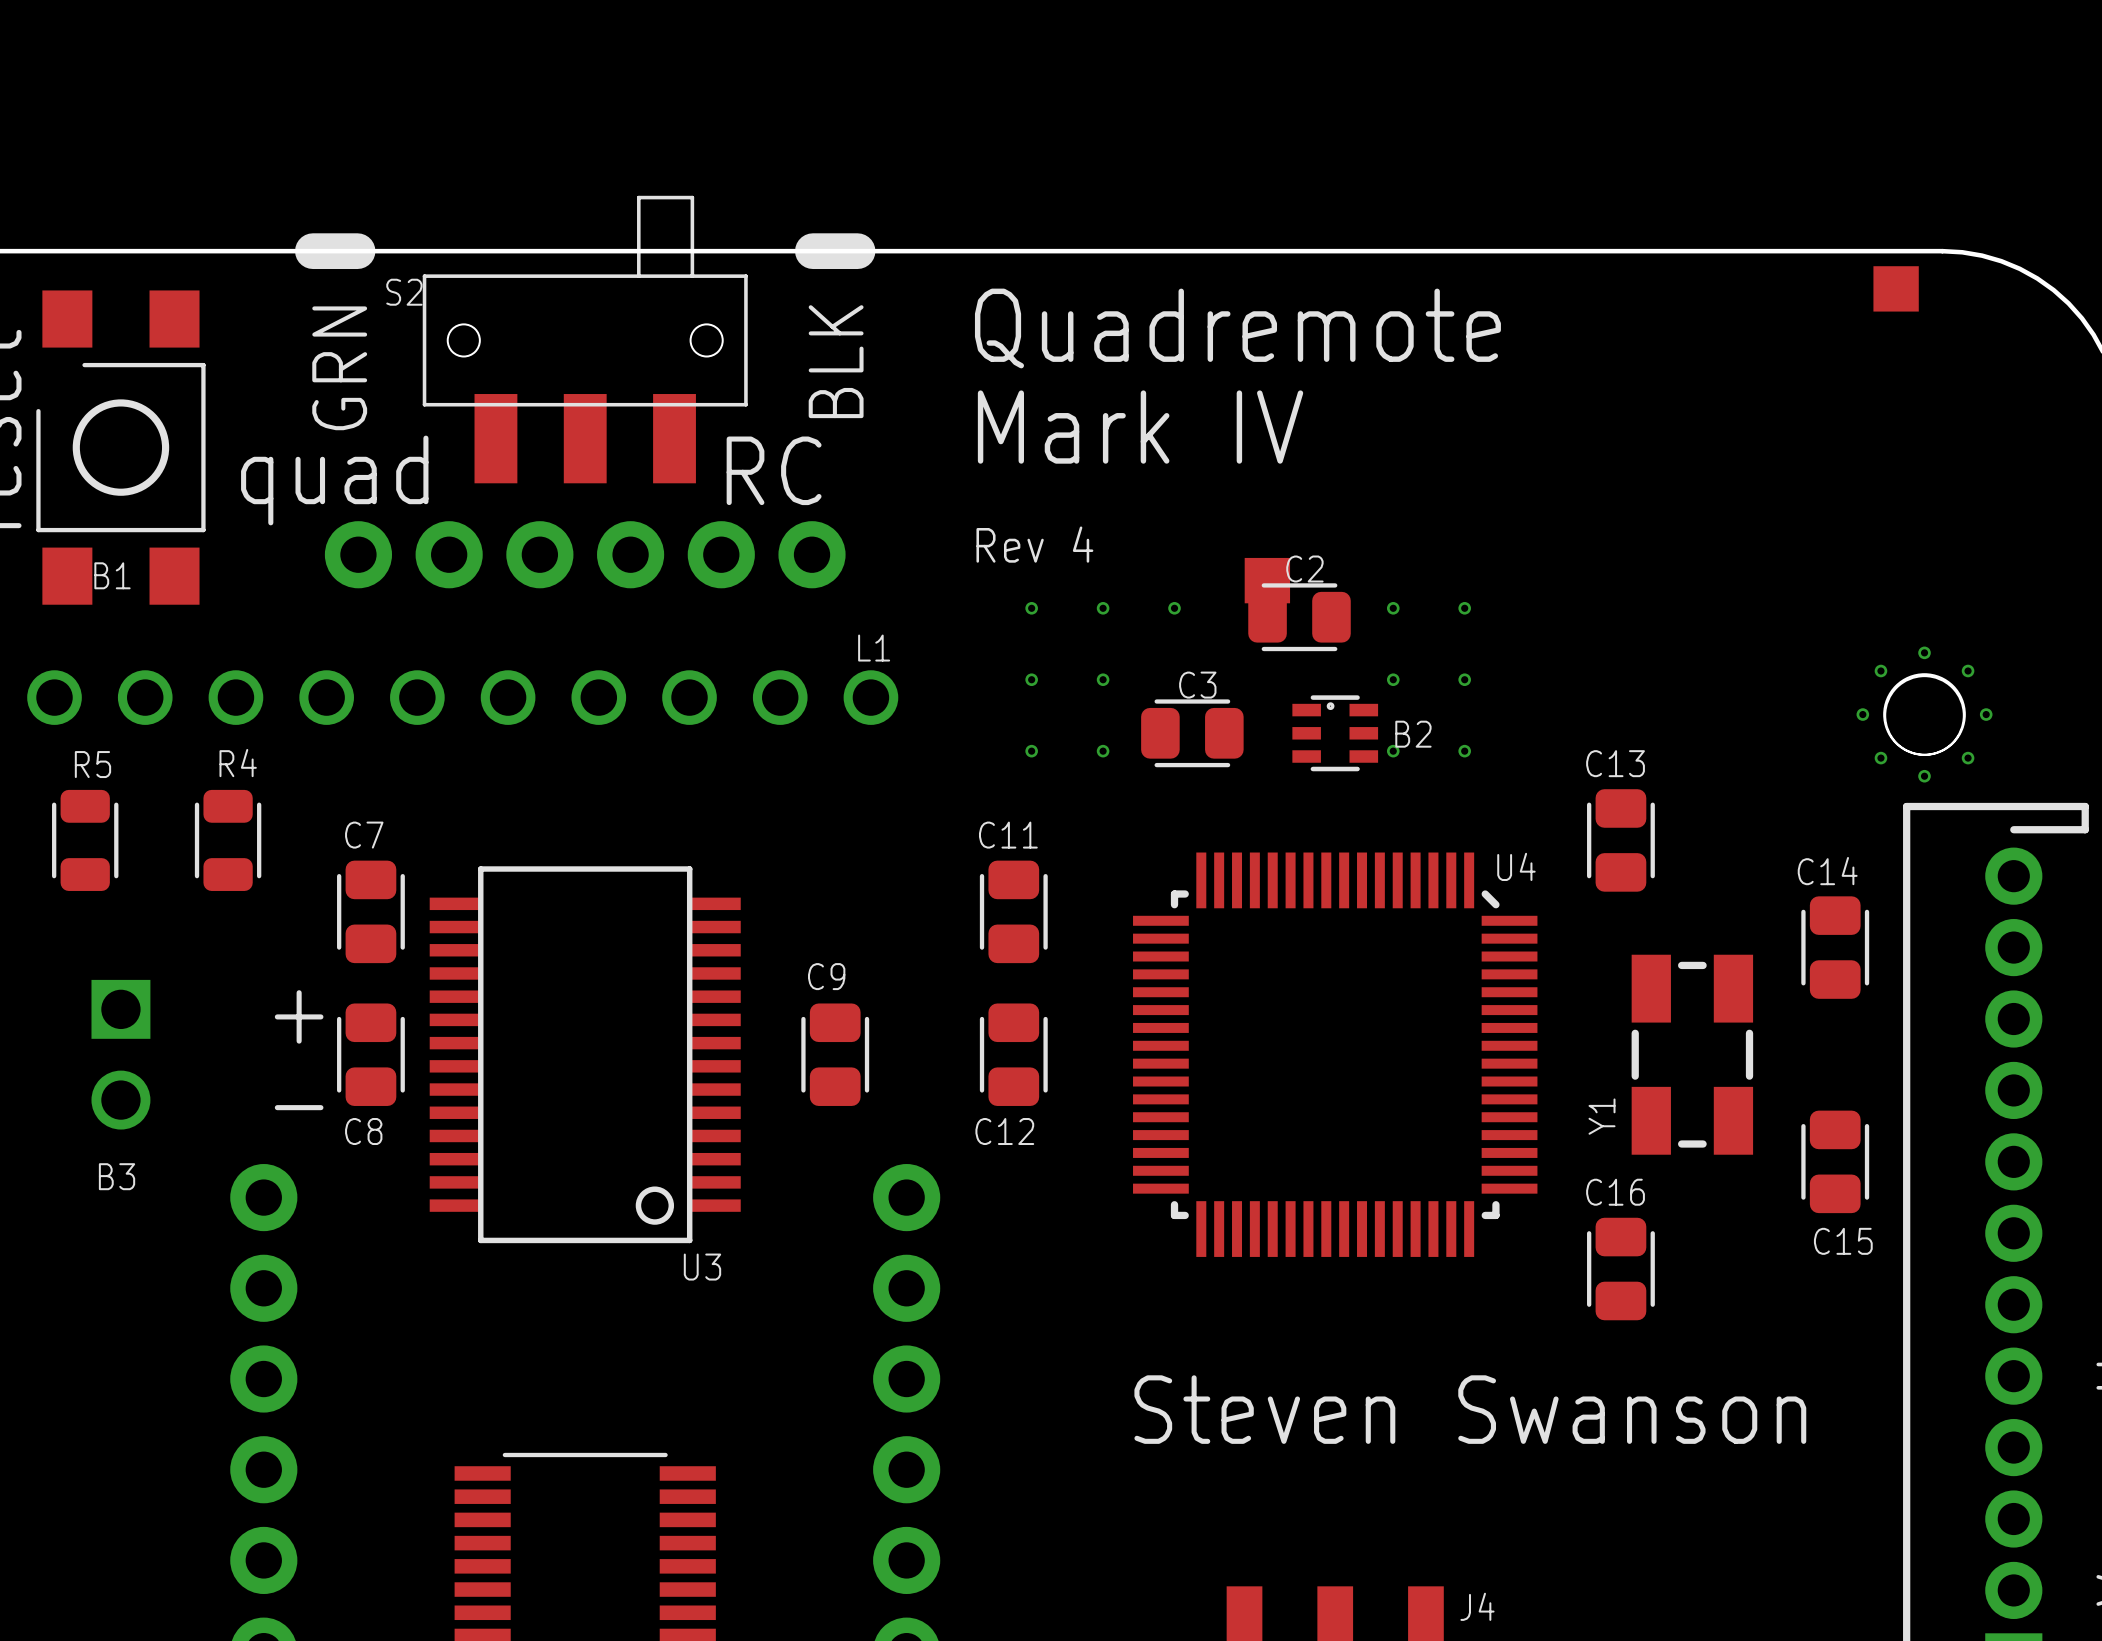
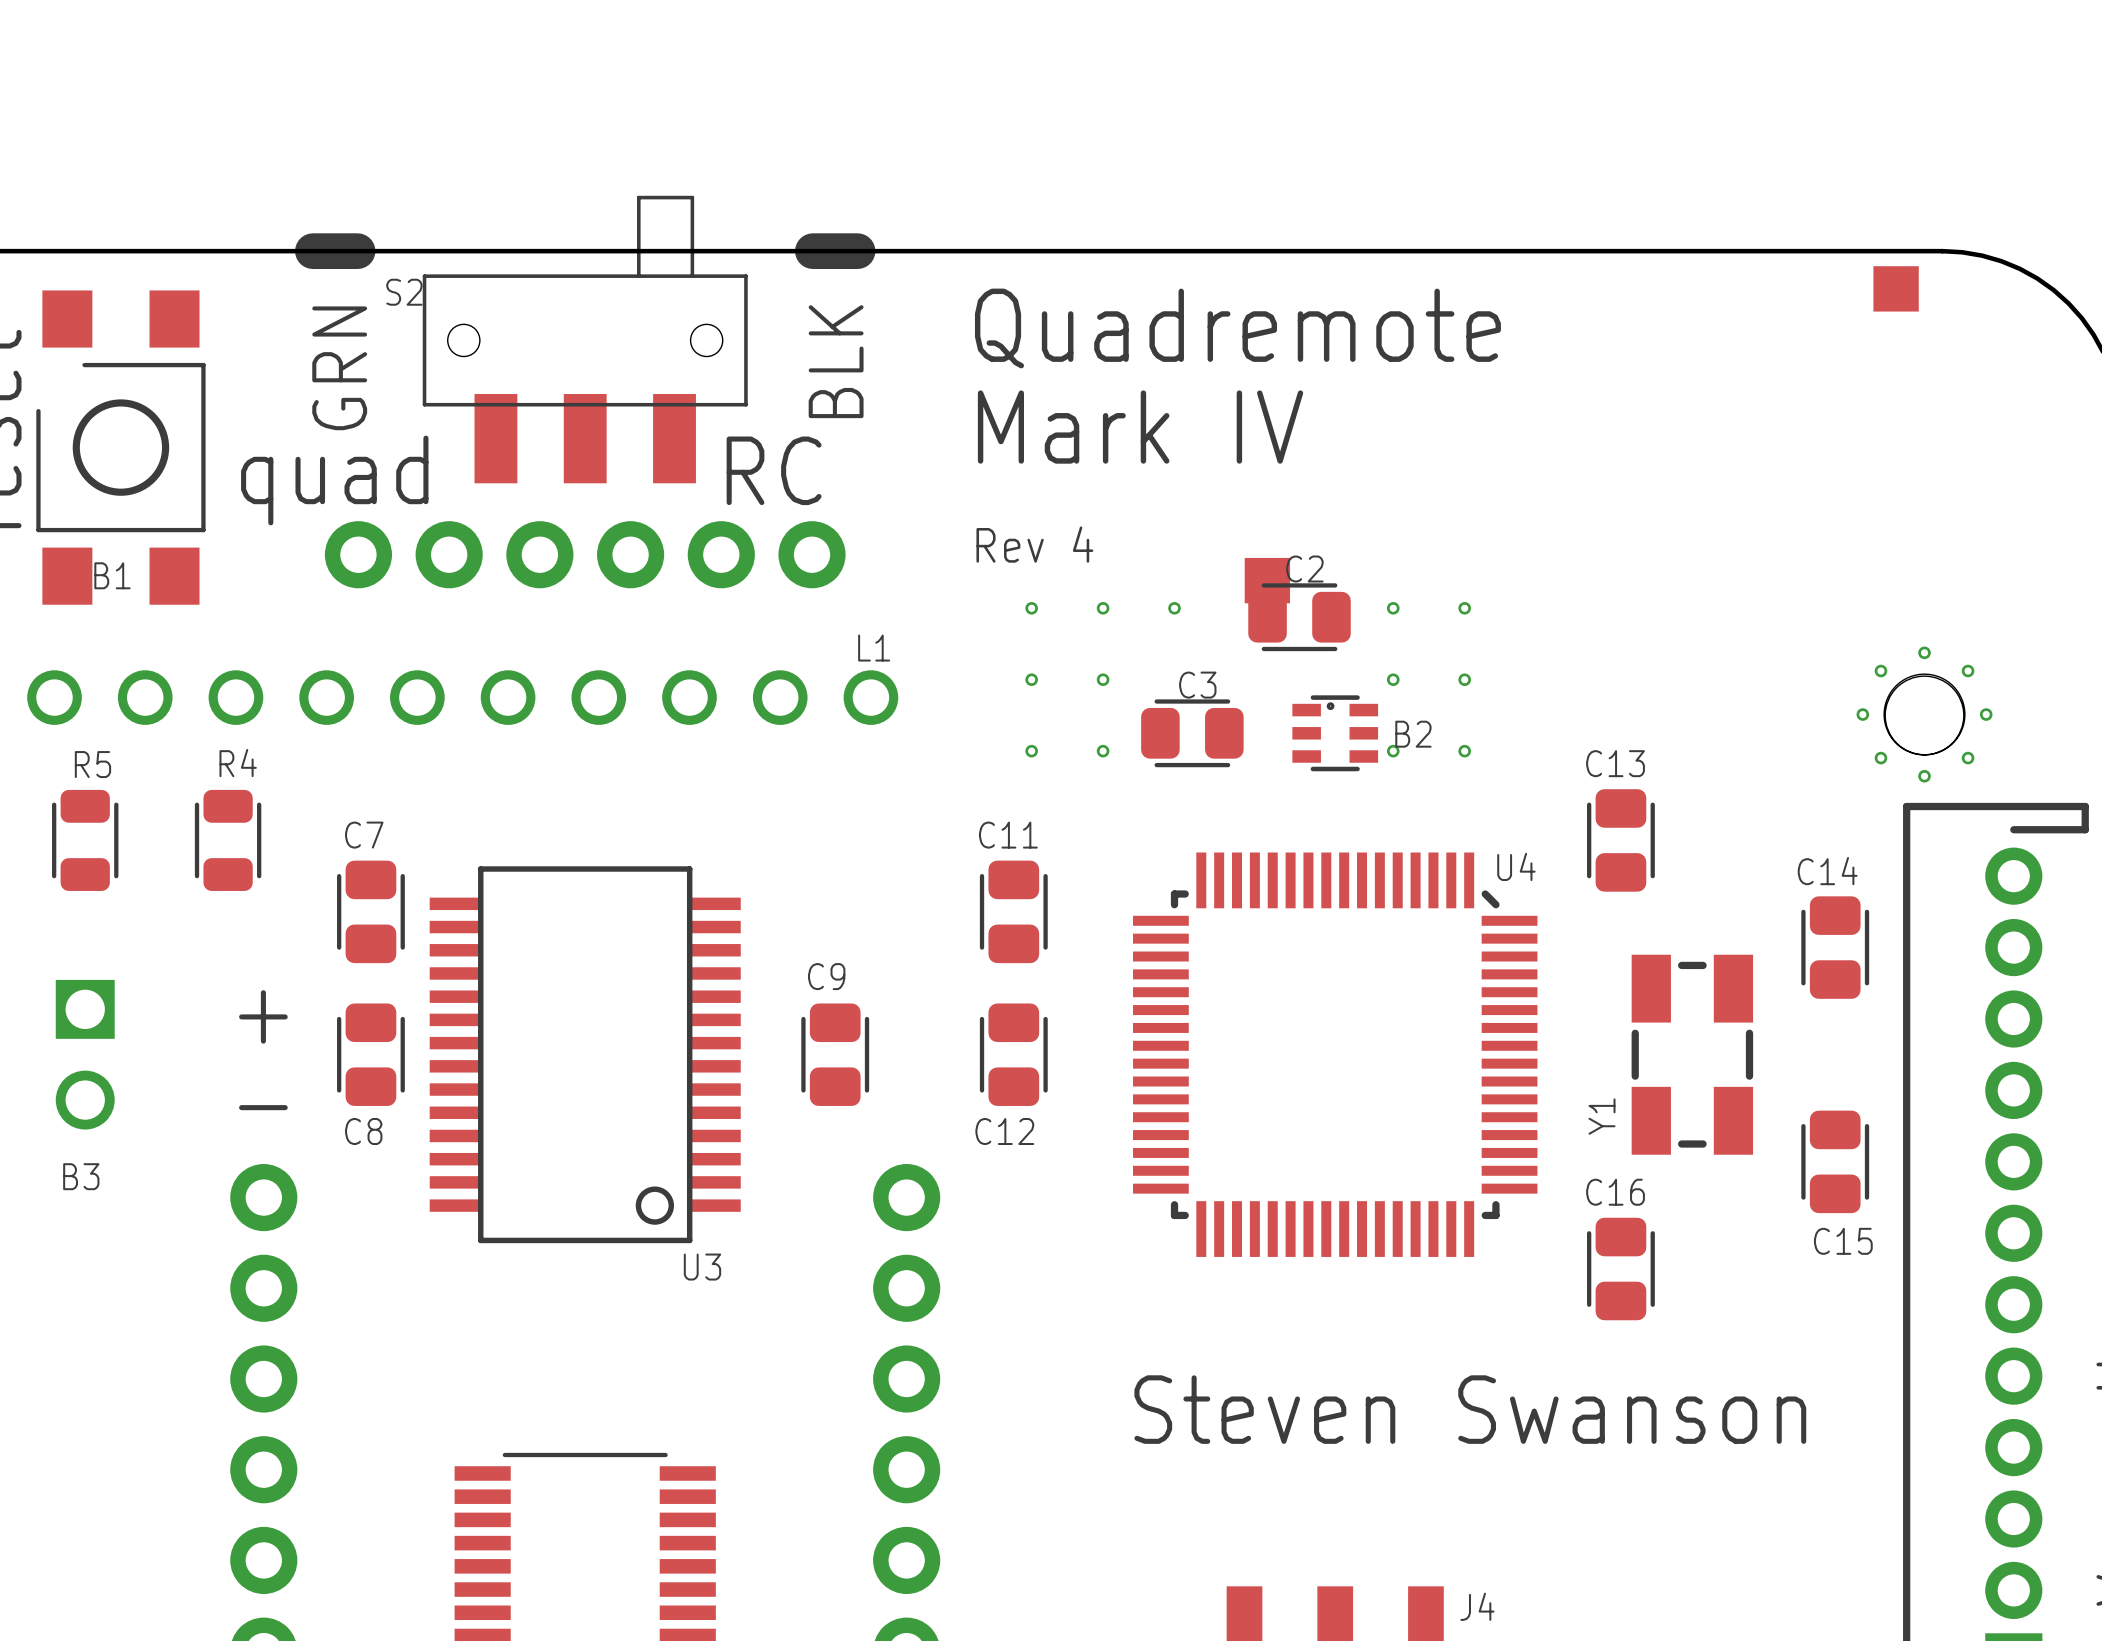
B3 position: (120, 1054) -> (85, 1054)

